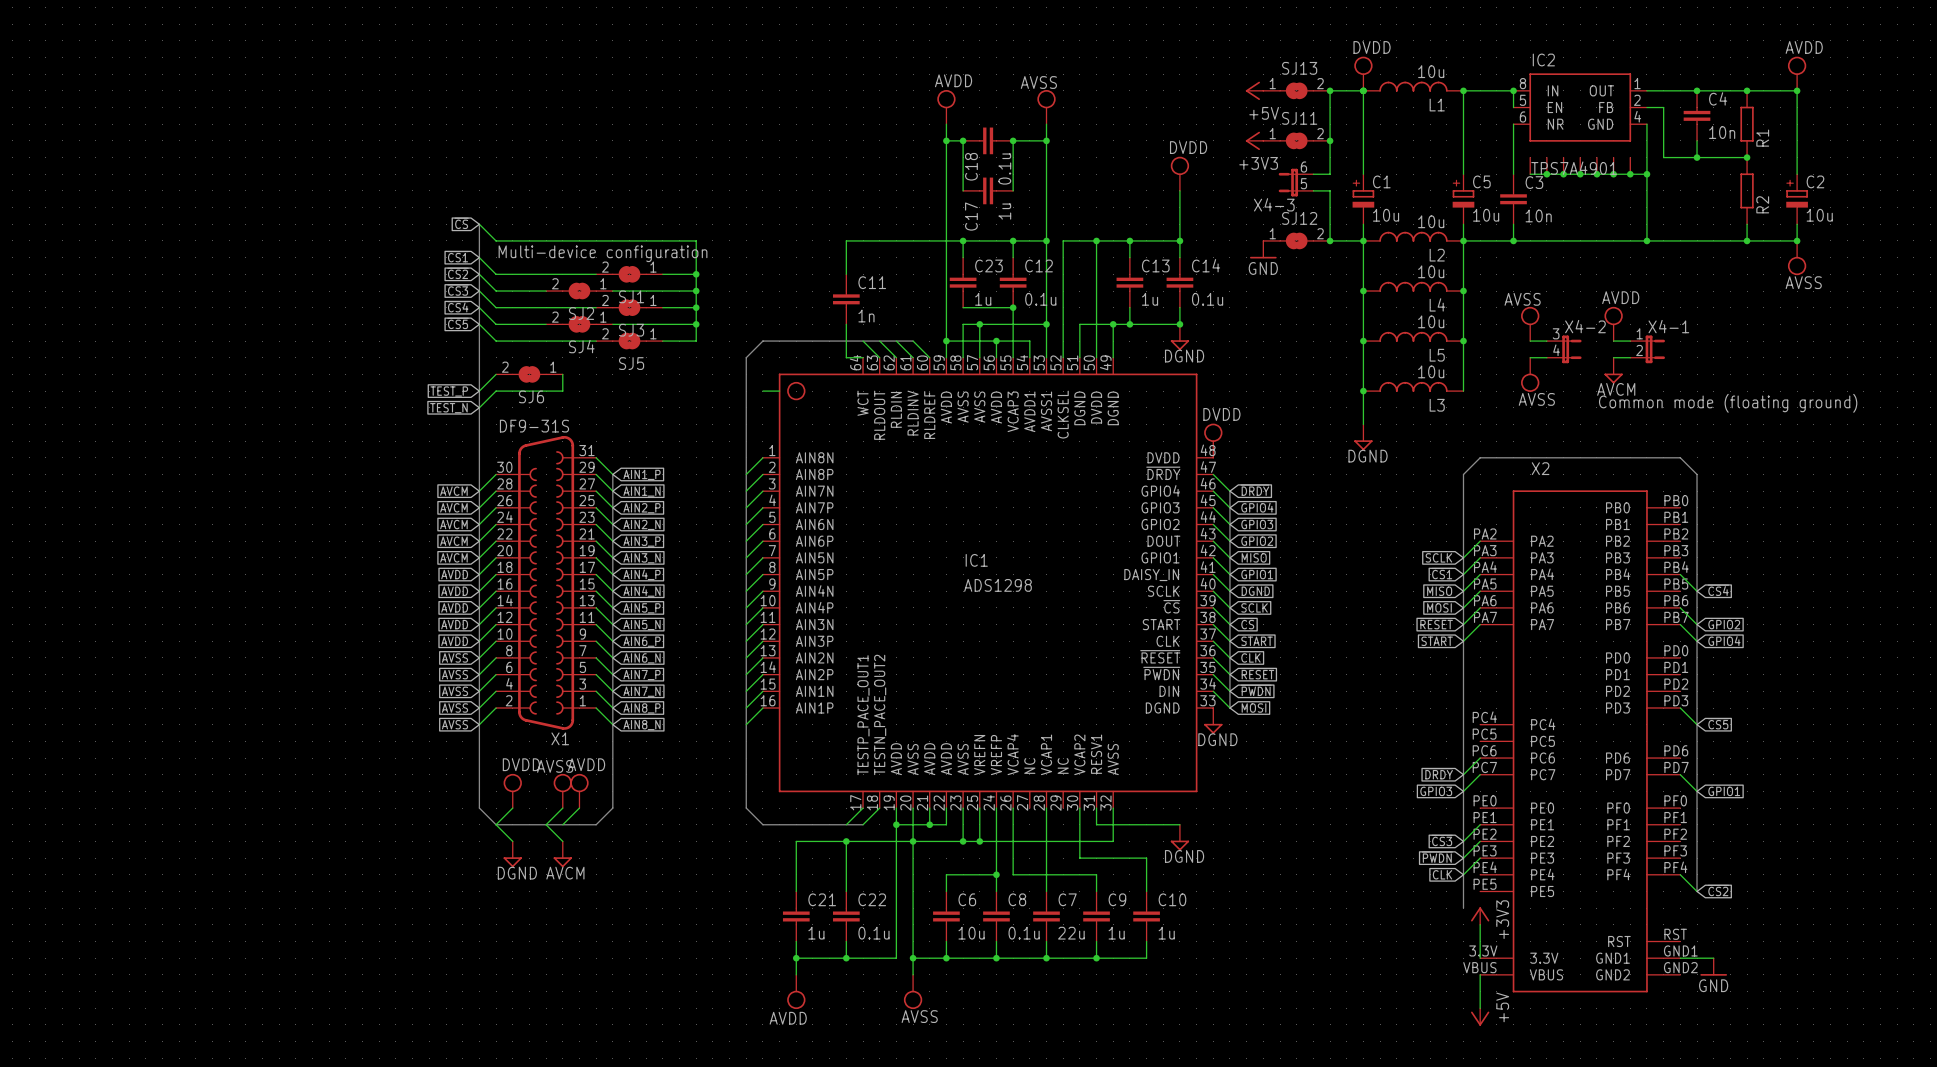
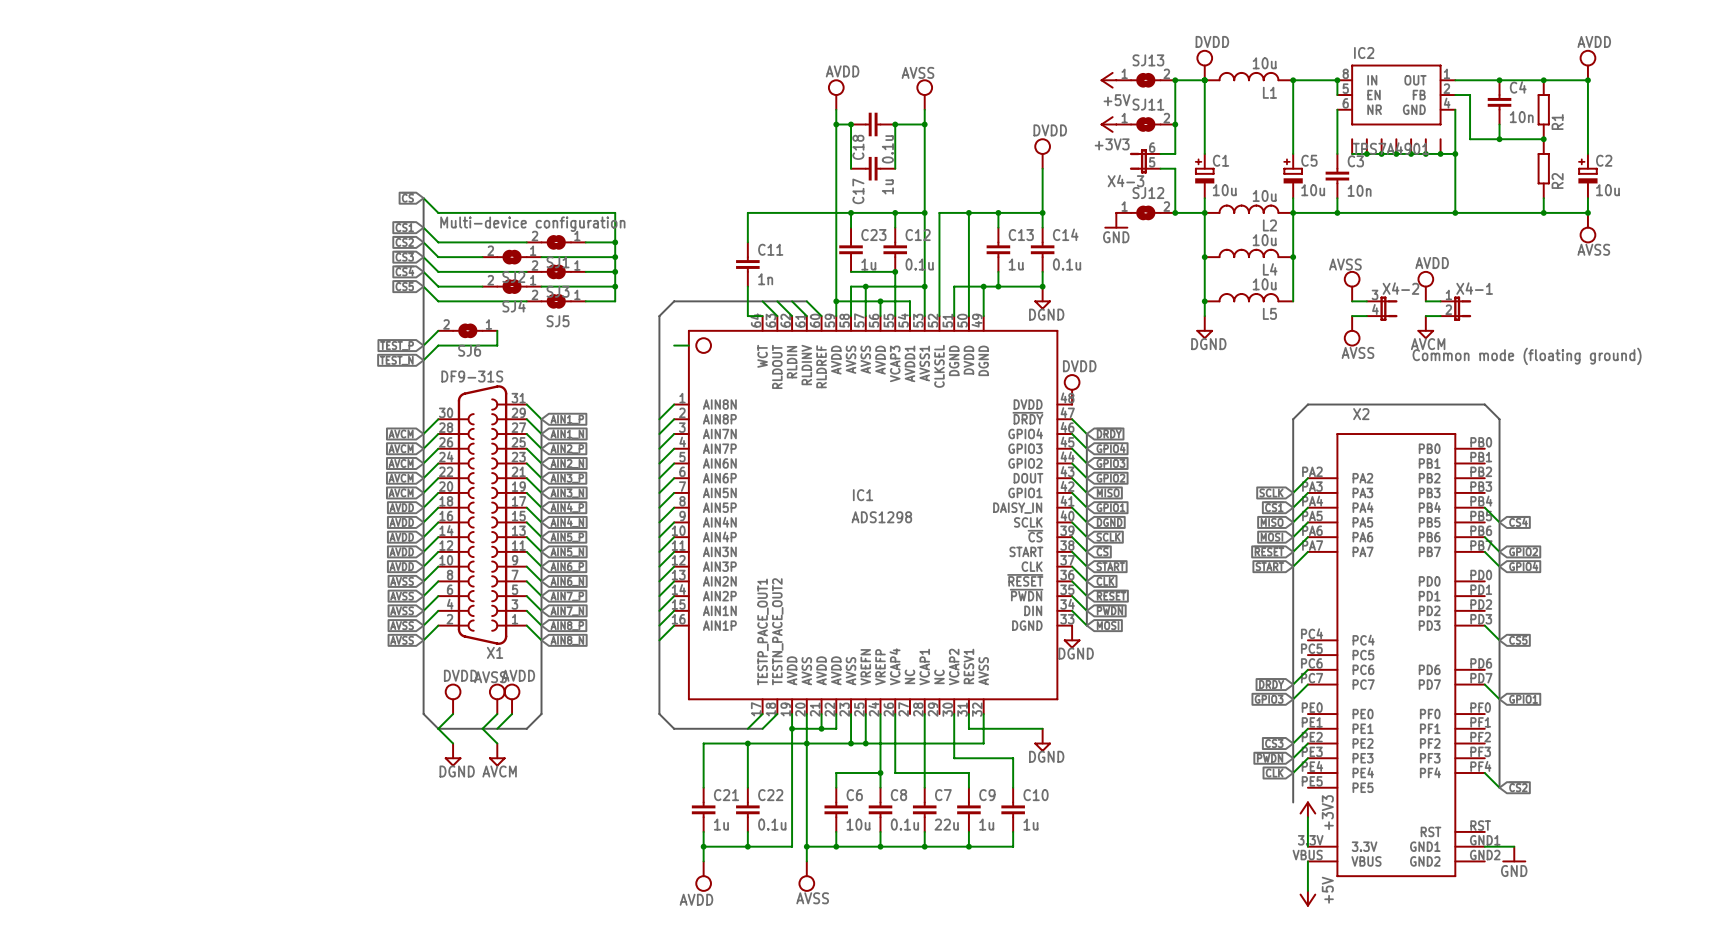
wire: (1463, 341) (1463, 391) -> none
junction: (1463, 341) -> none
wire: (1363, 357) (1363, 424) -> none
L3: 10u (1413, 386) -> none
junction: (1363, 391) -> none
power symbol position: DGND (1363, 437) -> DGND (1204, 327)

